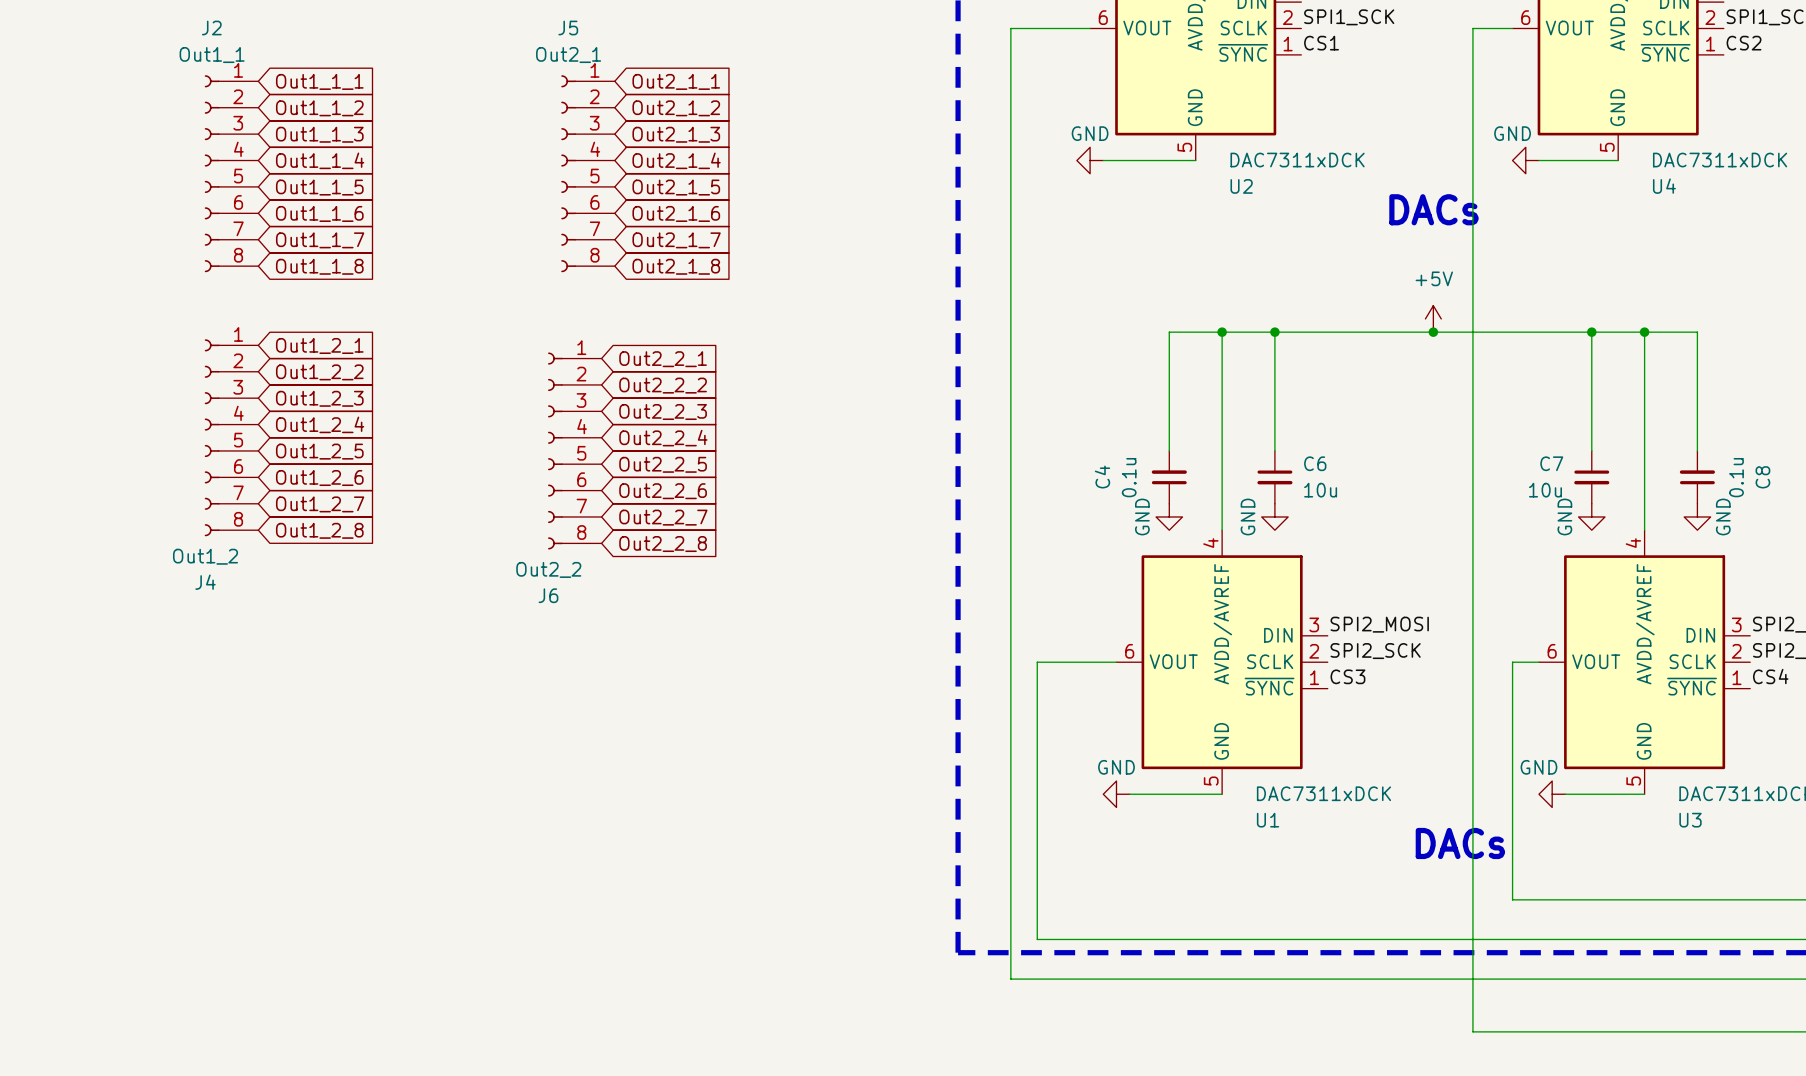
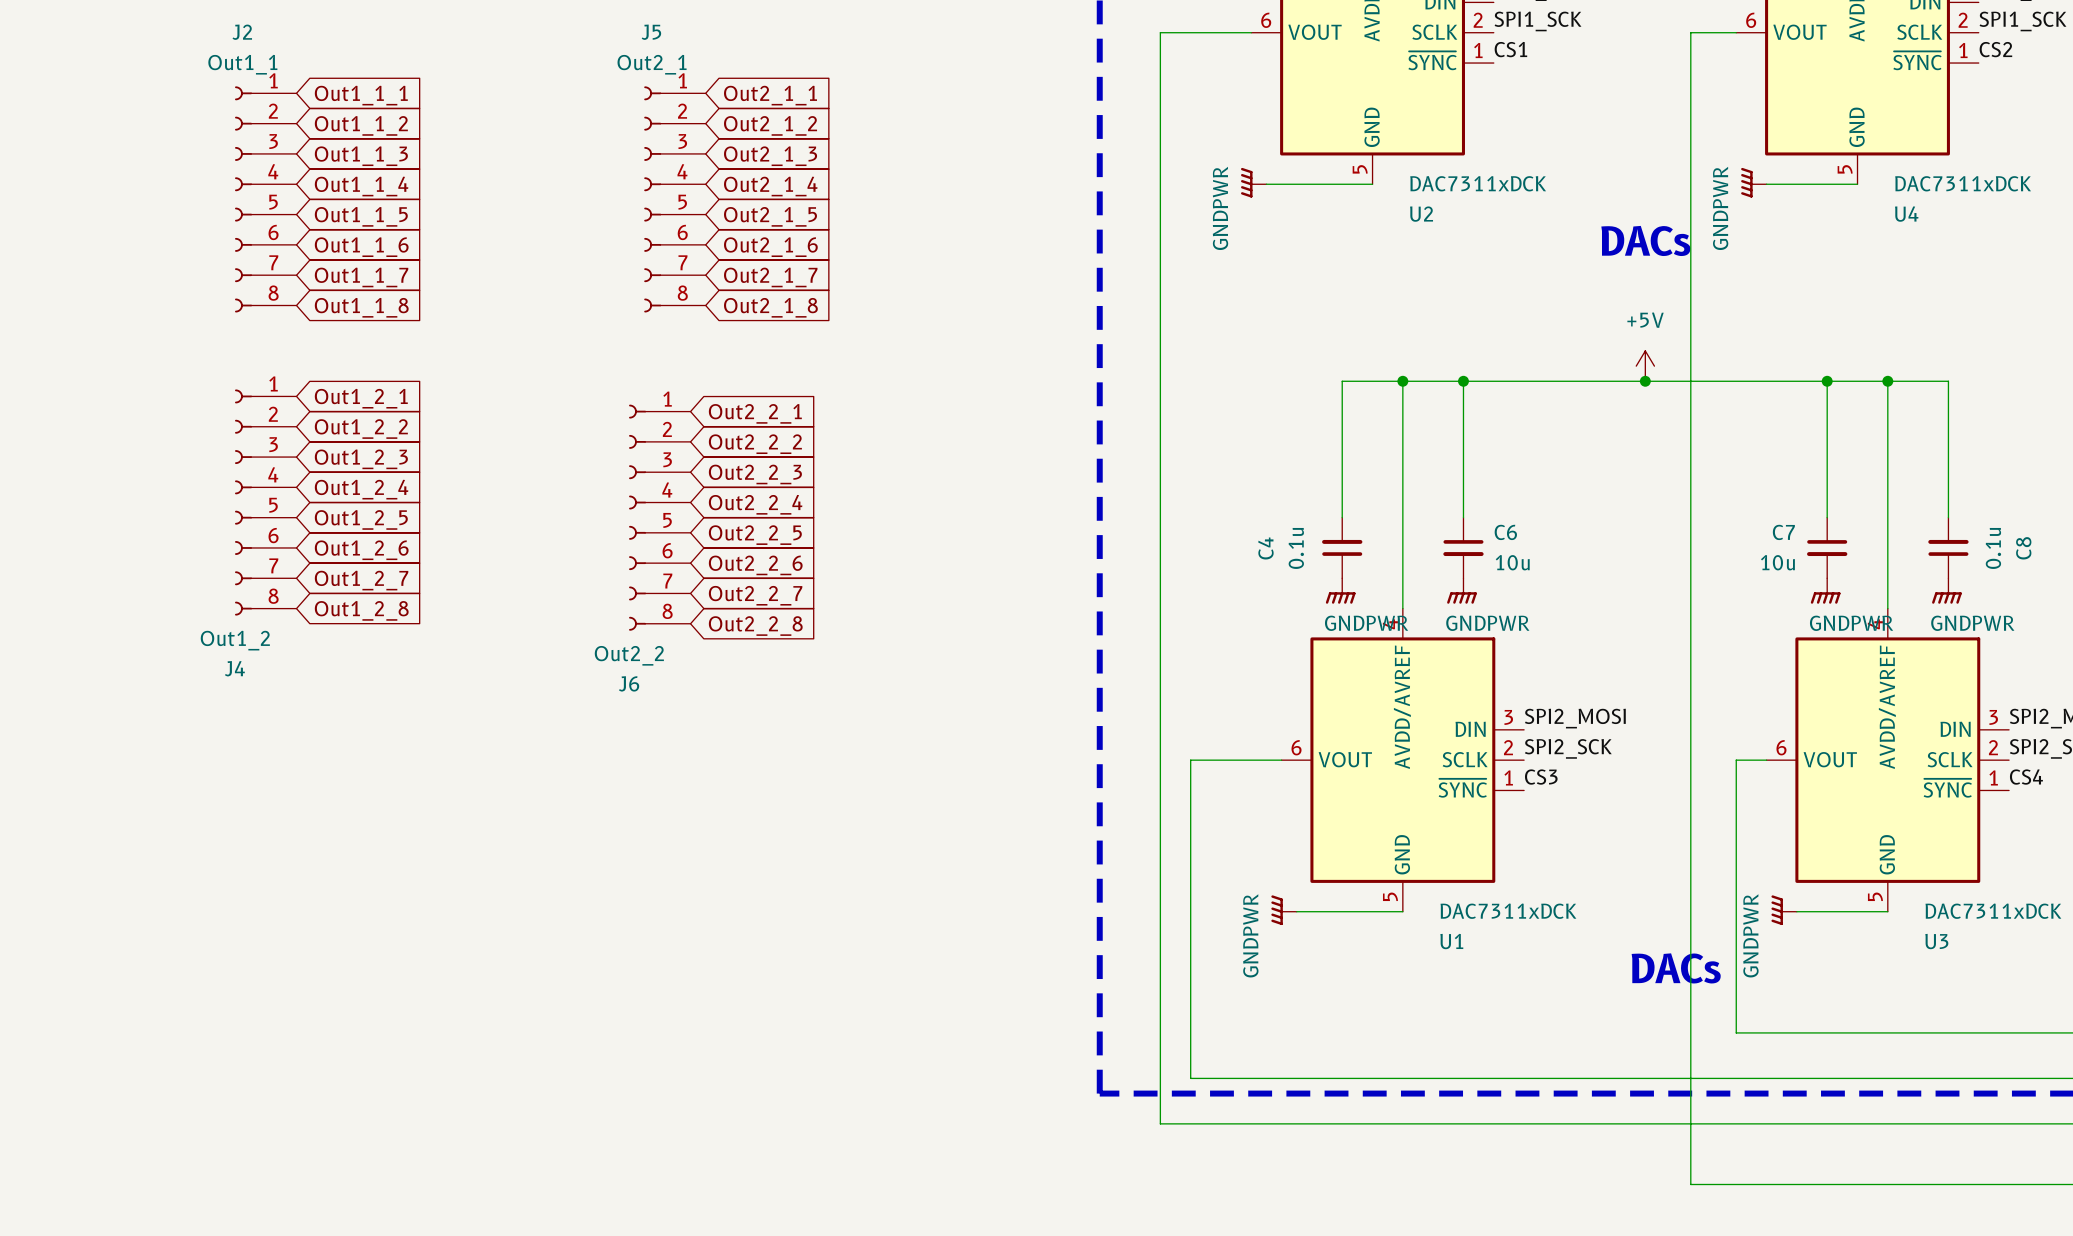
power symbol: GND (1090, 160) -> GNDPWR (1253, 182)
power symbol: GND (1525, 160) -> GNDPWR (1753, 182)
power symbol: GND (1169, 516) -> GNDPWR (1340, 591)
power symbol: GND (1274, 516) -> GNDPWR (1461, 591)
power symbol: GND (1591, 516) -> GNDPWR (1825, 591)
power symbol: GND (1697, 516) -> GNDPWR (1946, 591)
power symbol: GND (1116, 794) -> GNDPWR (1284, 910)
power symbol: GND (1552, 794) -> GNDPWR (1784, 910)

